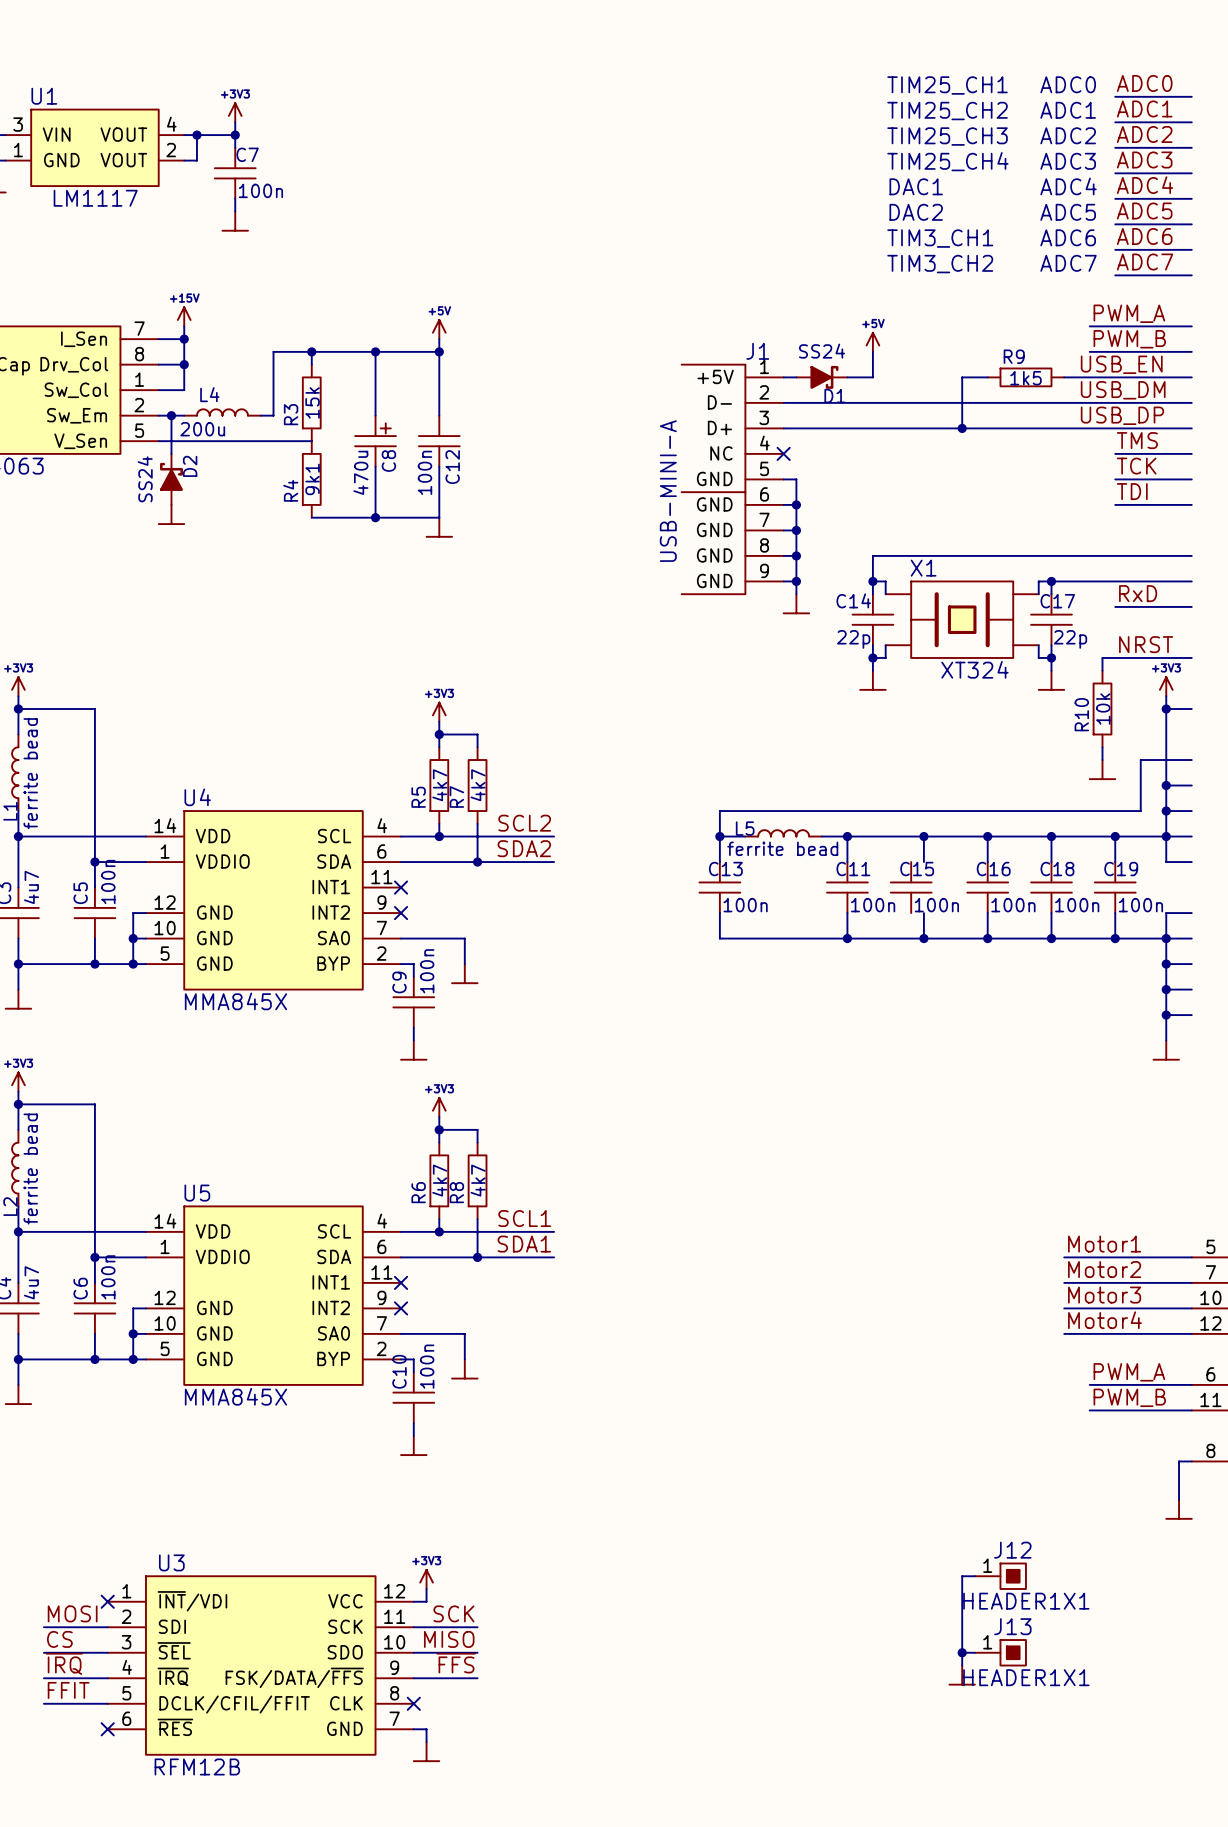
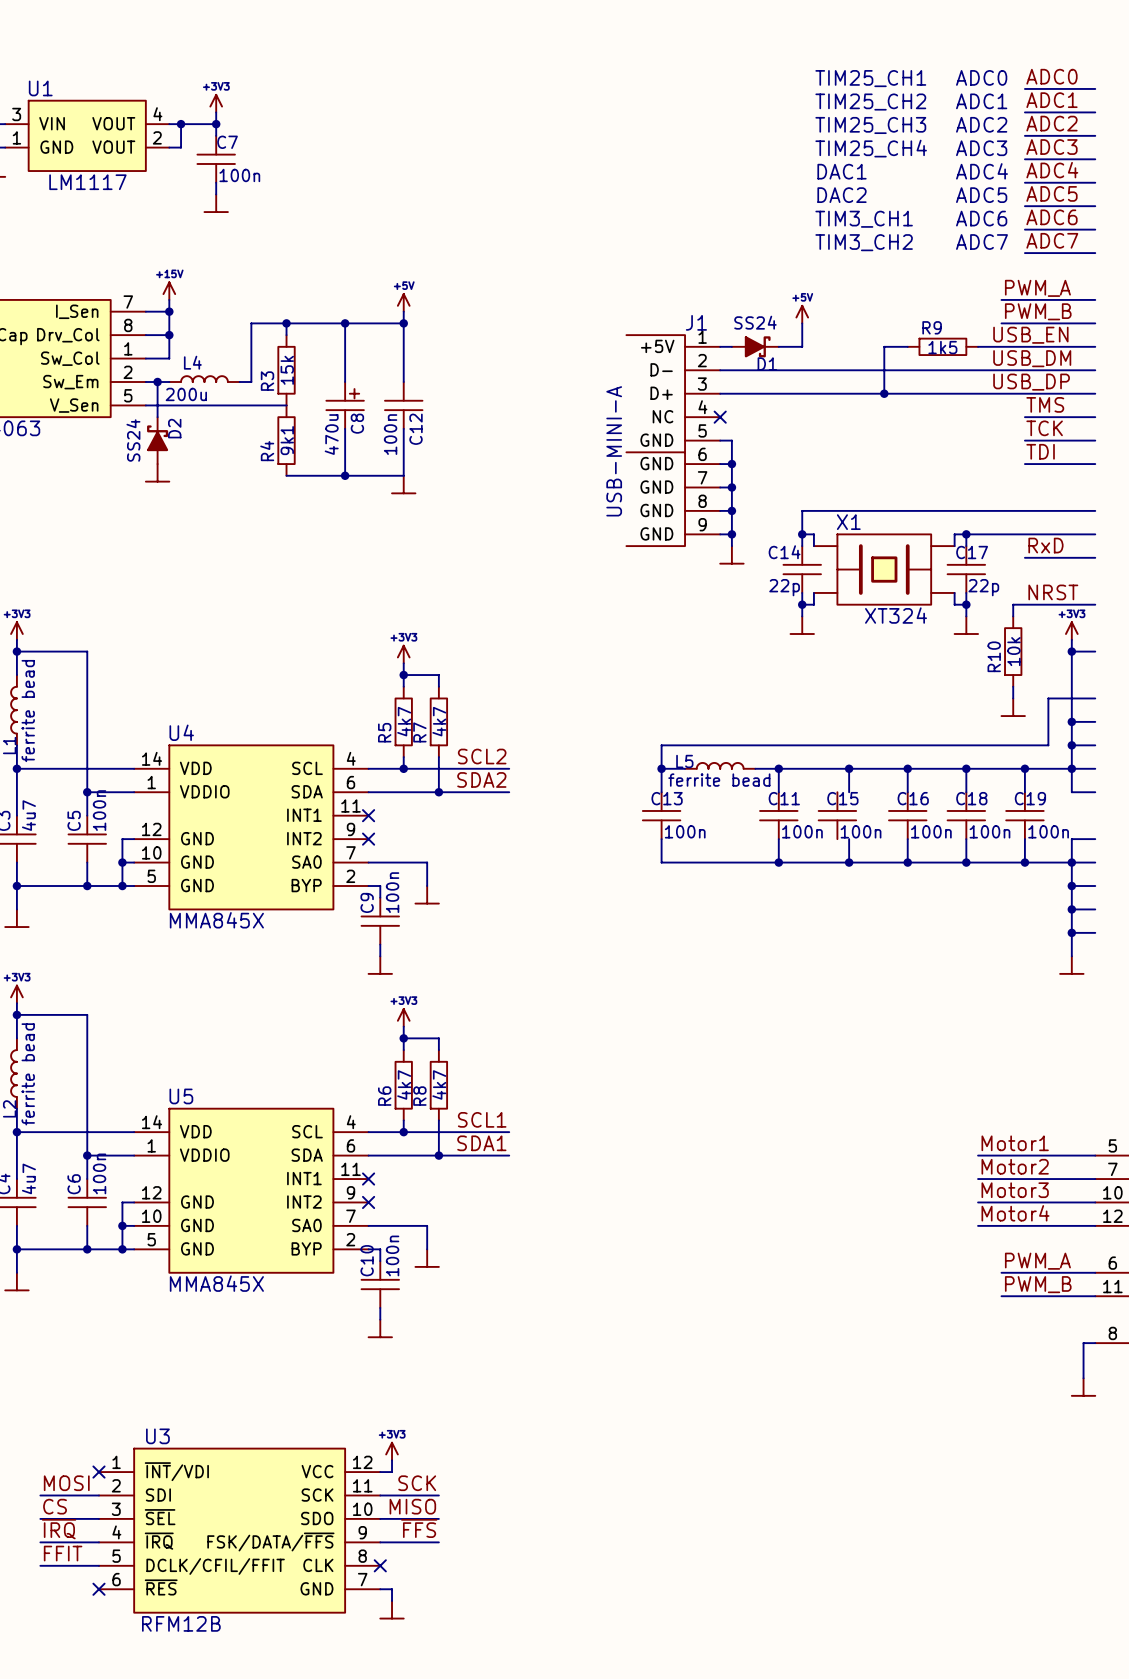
wire: (974, 1576) (962, 1576) (962, 1665) -> none
J12: HEADER1X1 (1000, 1576) -> none
wire: (962, 1652) (974, 1652) -> none
junction: (962, 1652) -> none
J13: HEADER1X1 (1000, 1652) -> none
power symbol: (962, 1675) -> none

